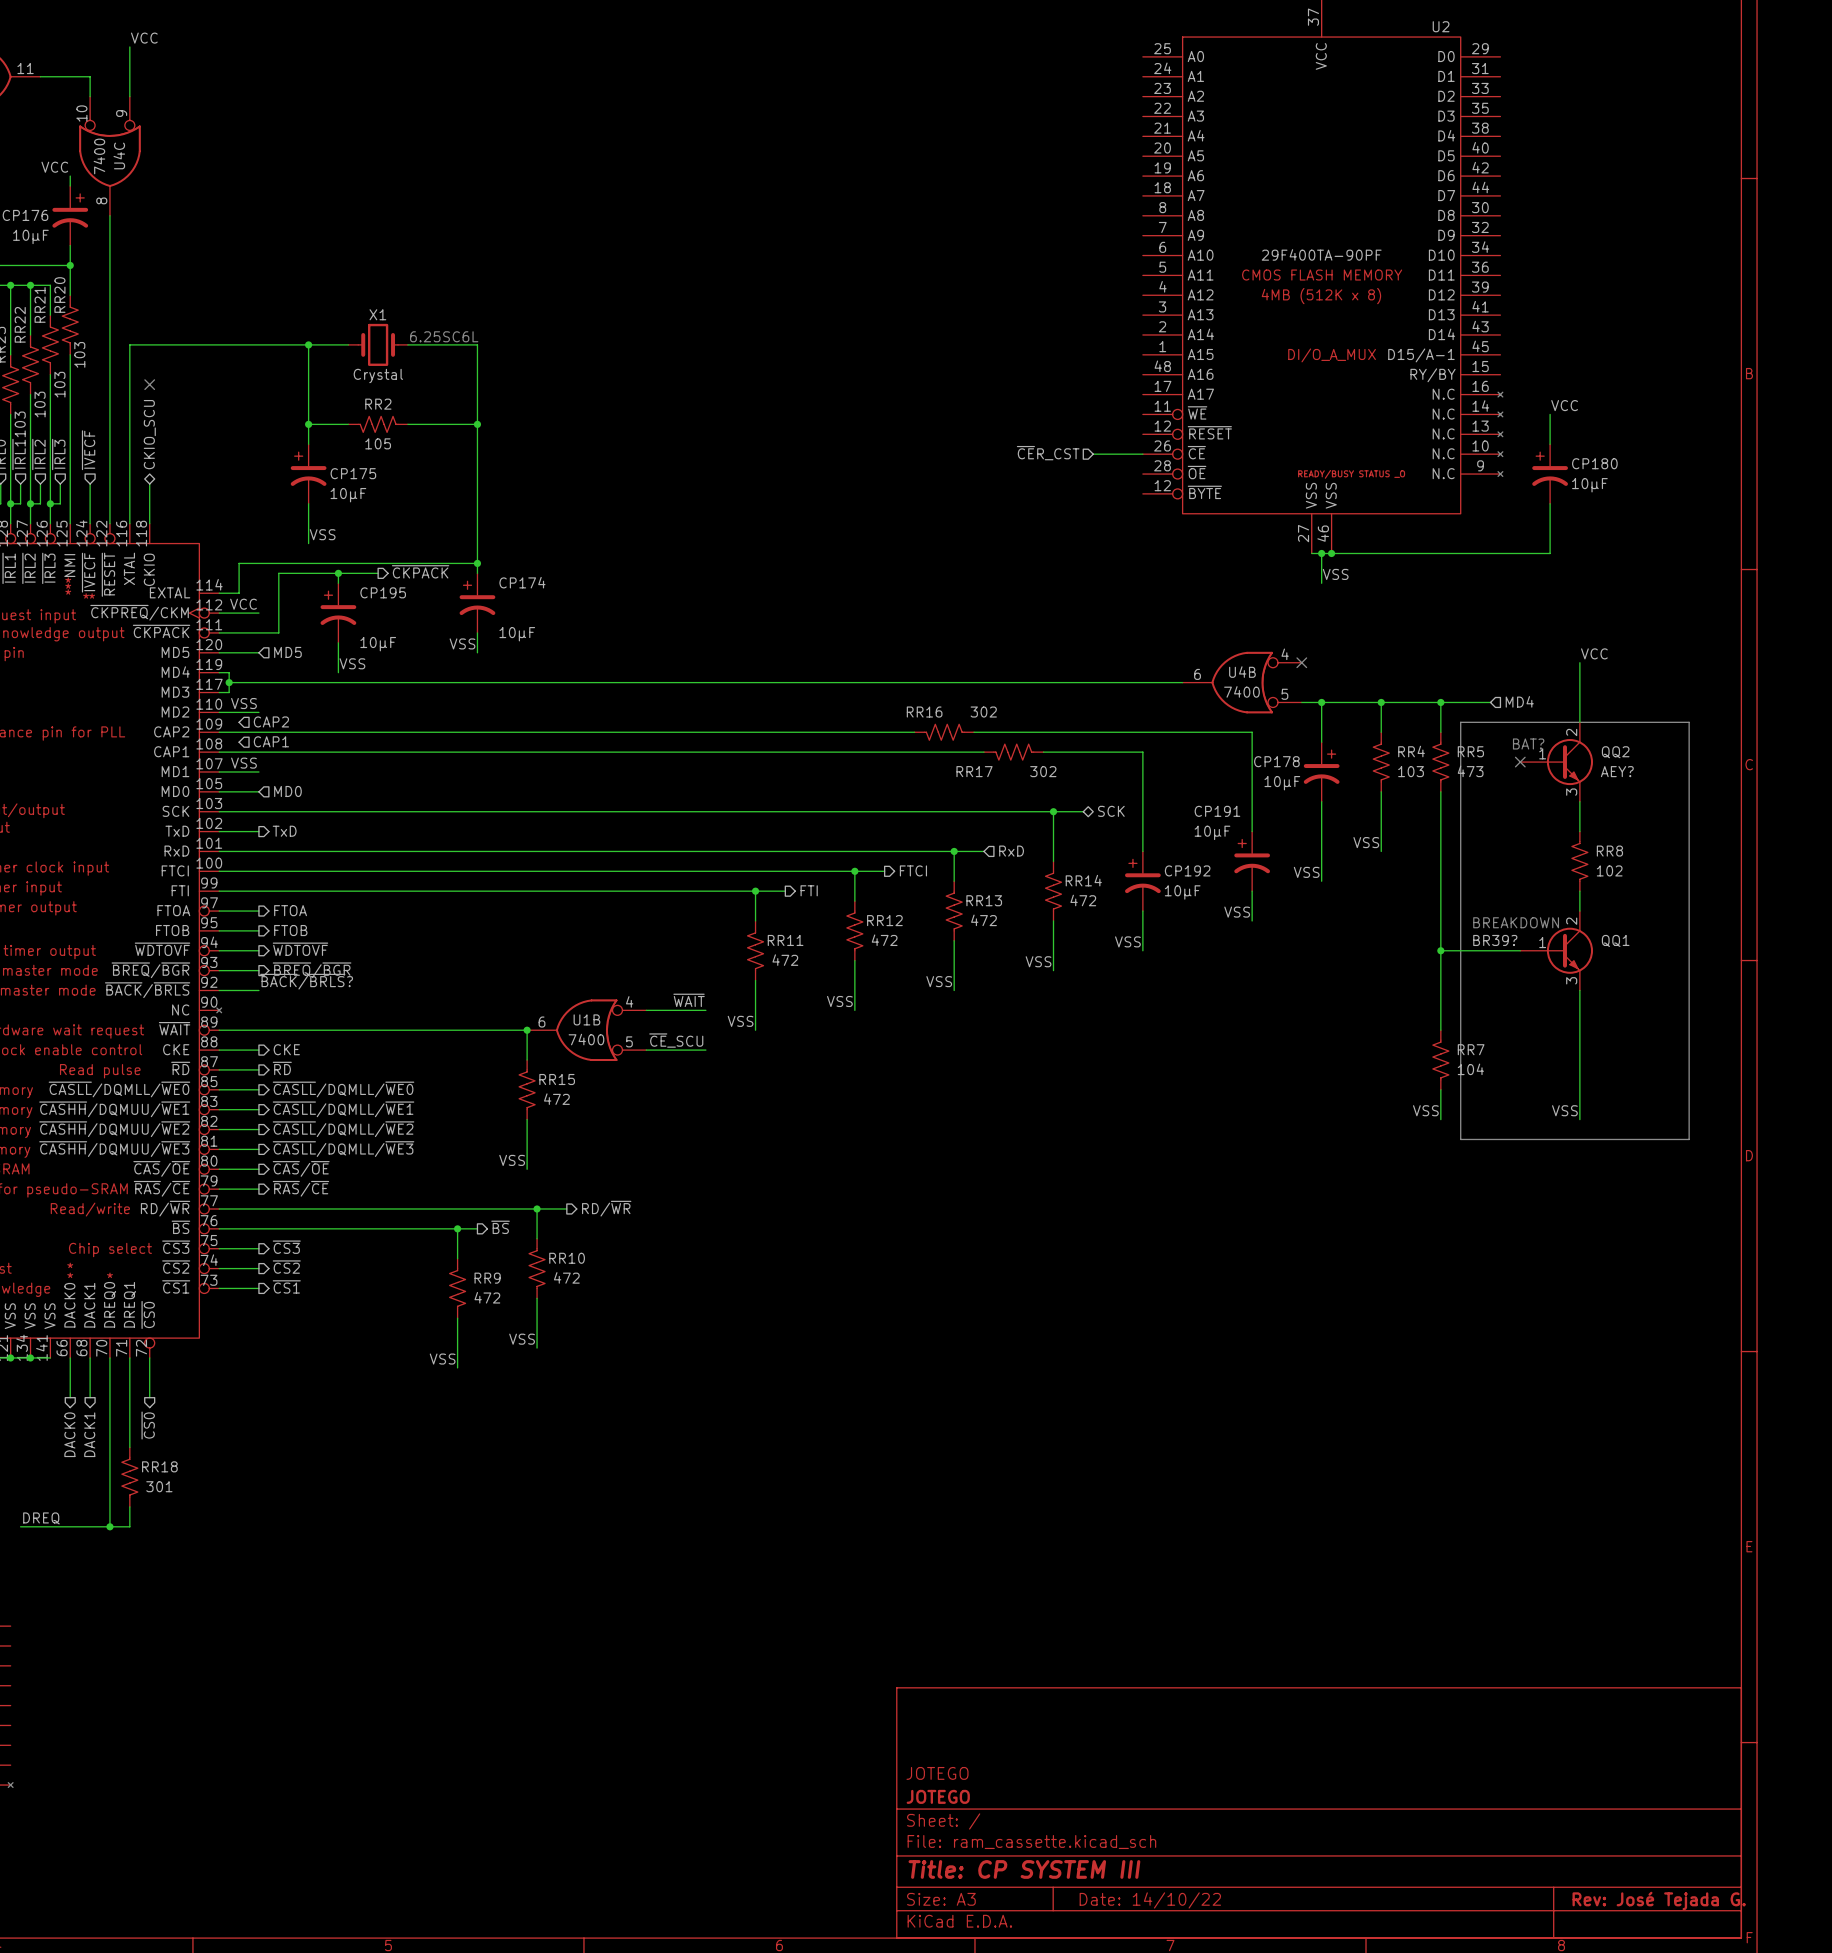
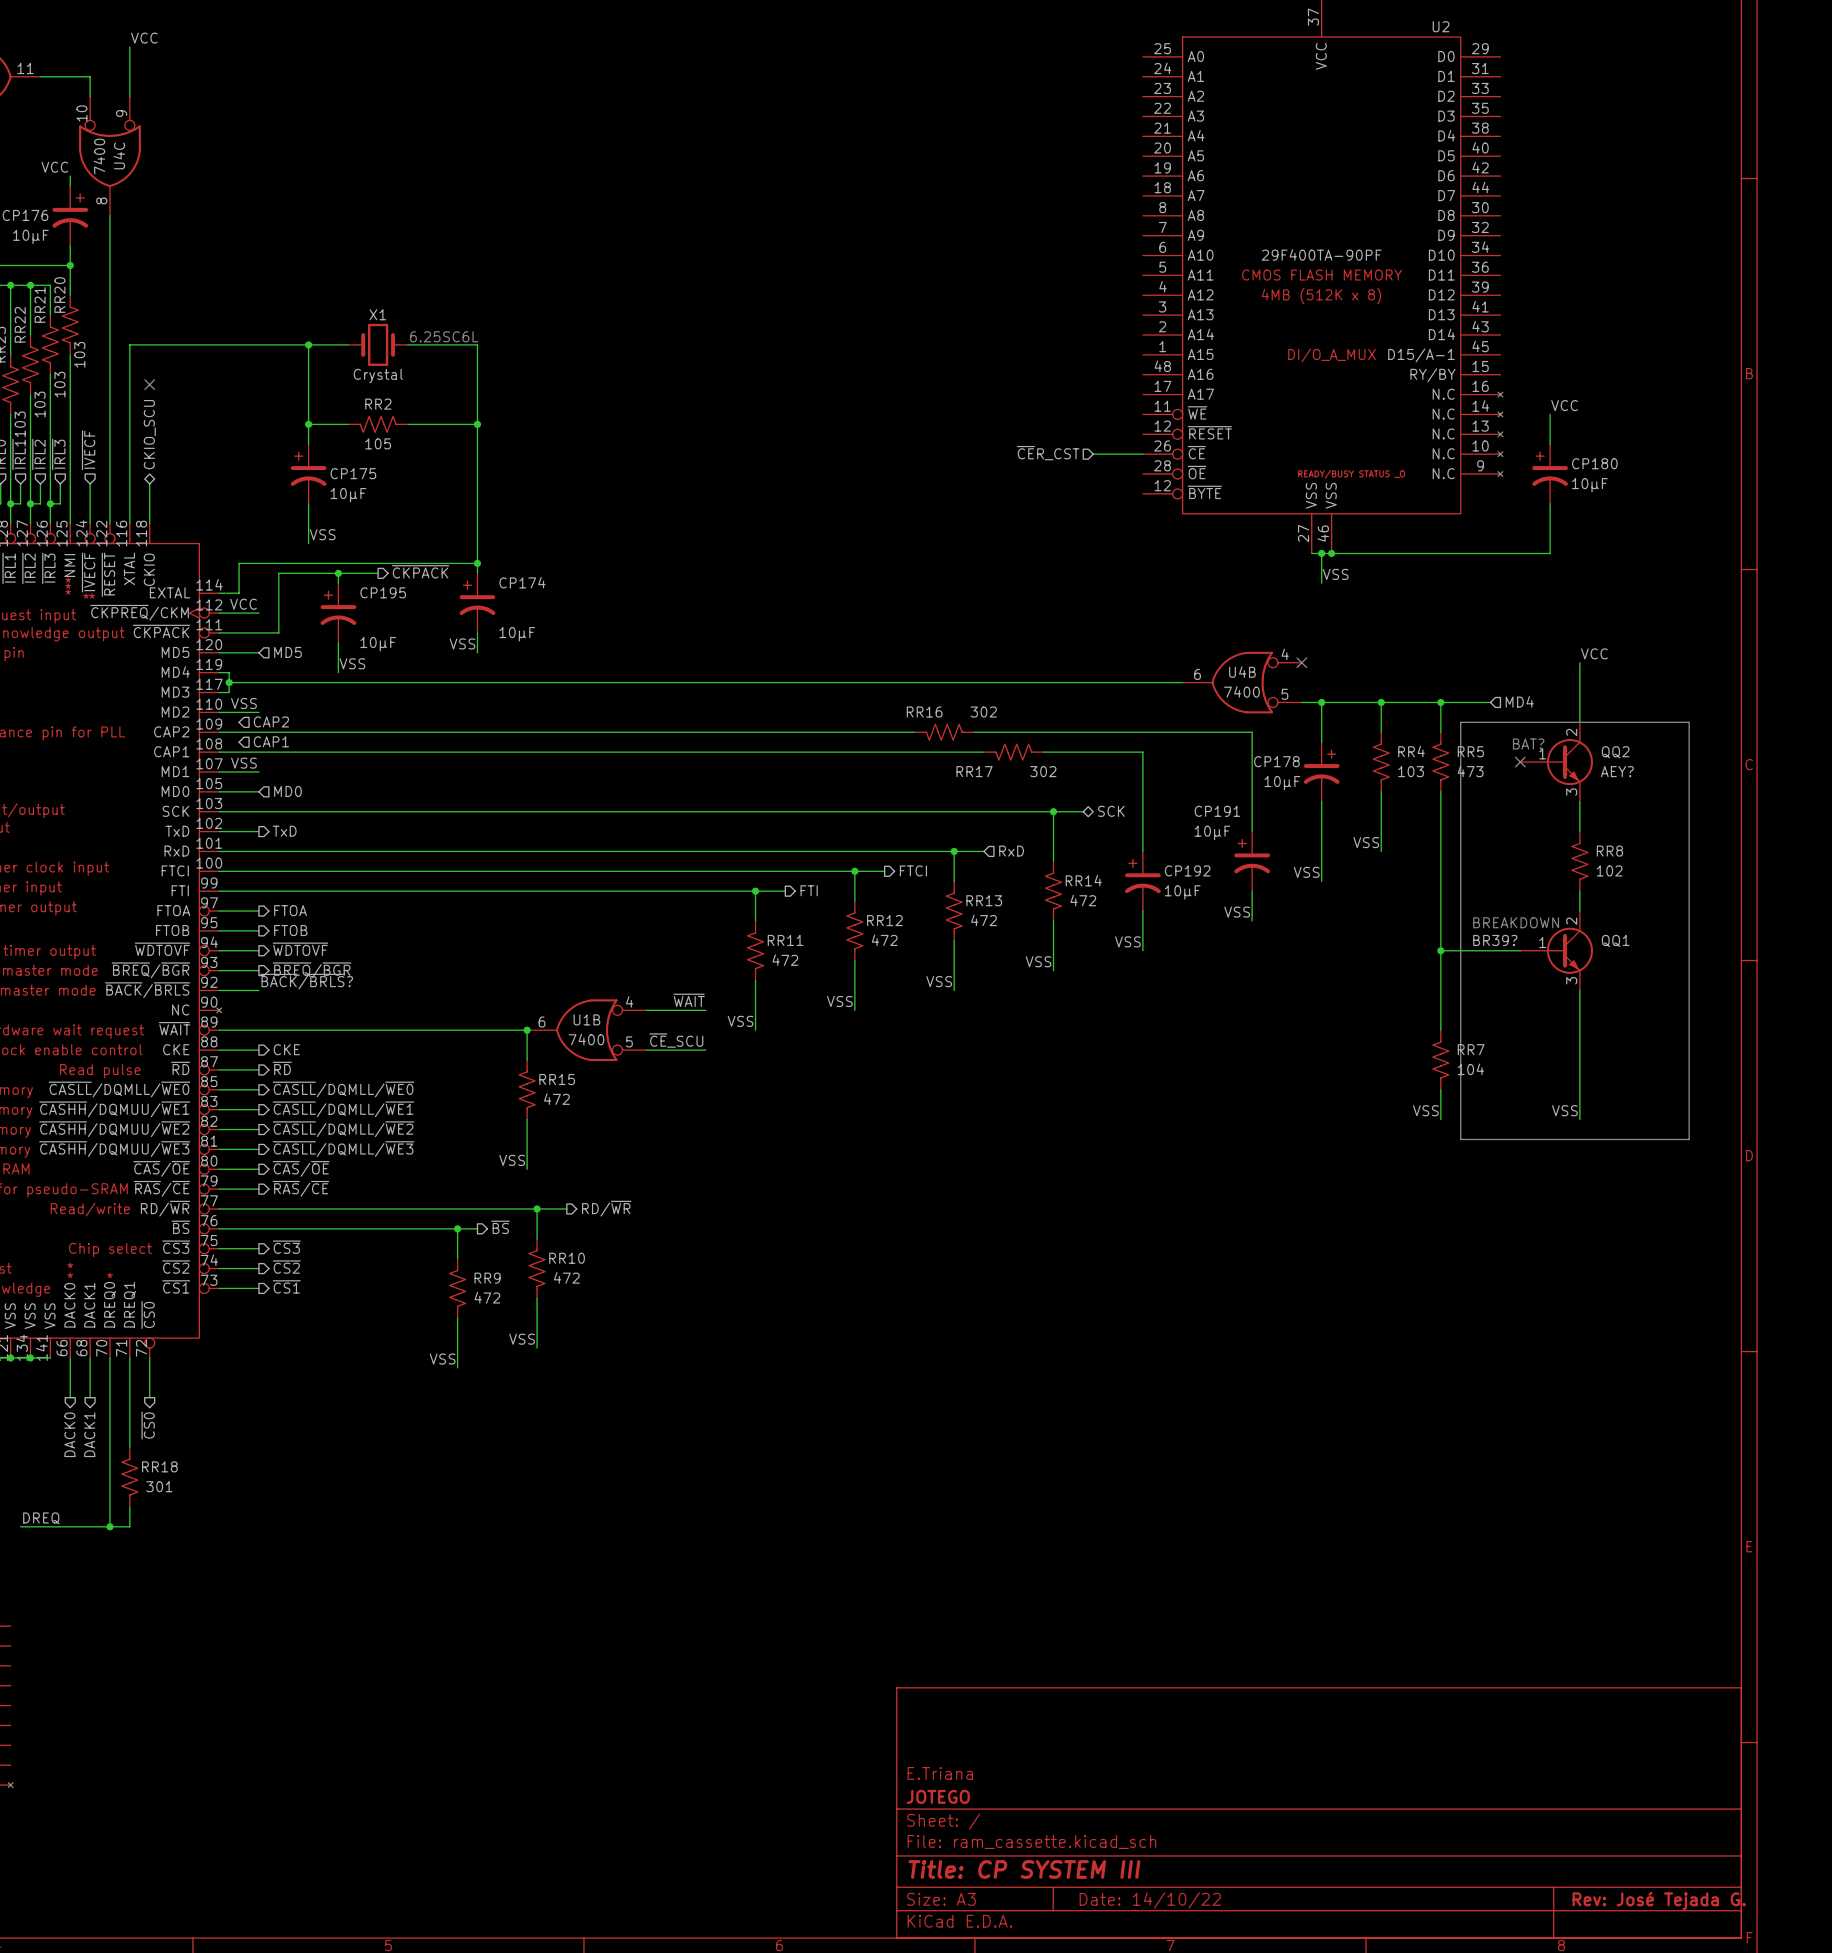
title block: JOTEGO (937, 1773) -> E.Triana (940, 1773)

